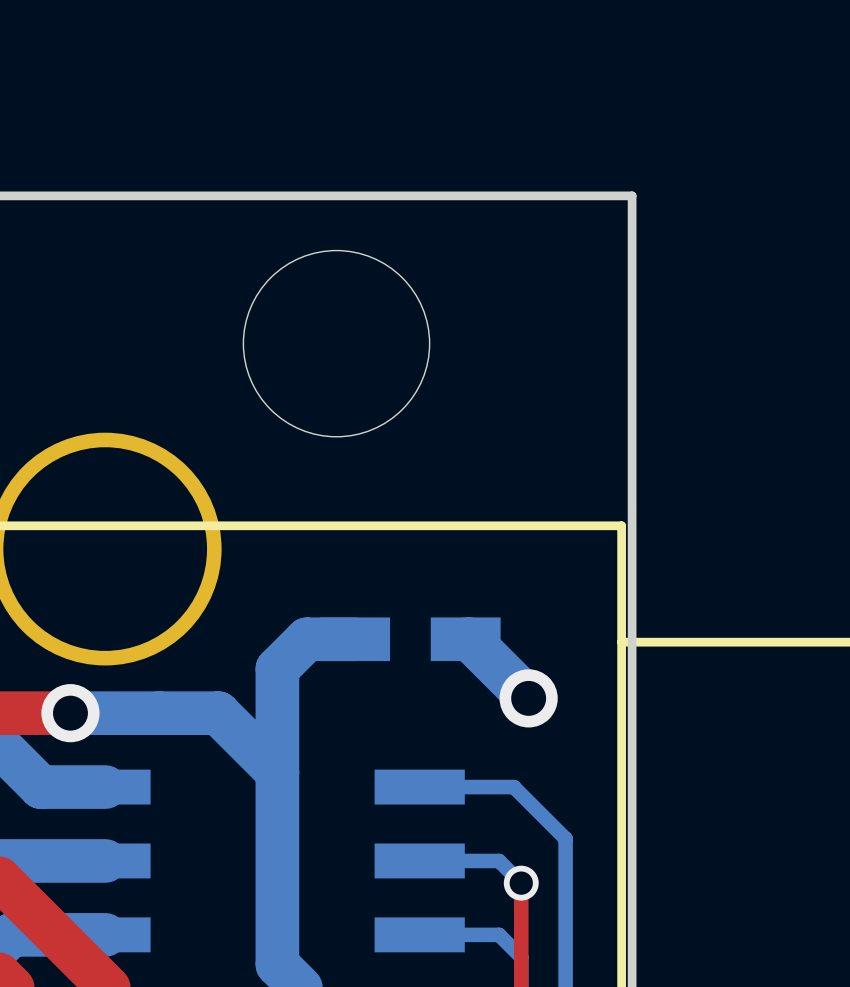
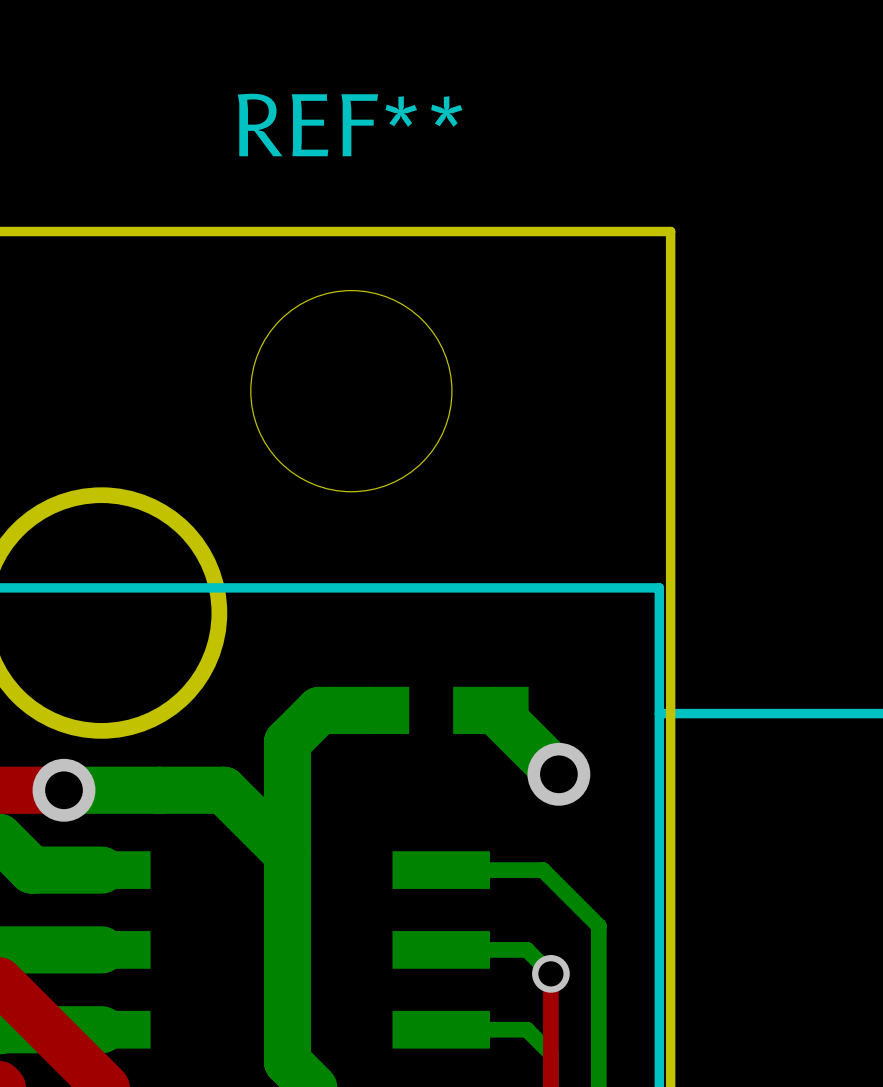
REF** name: none -> REF** (350, 125)

